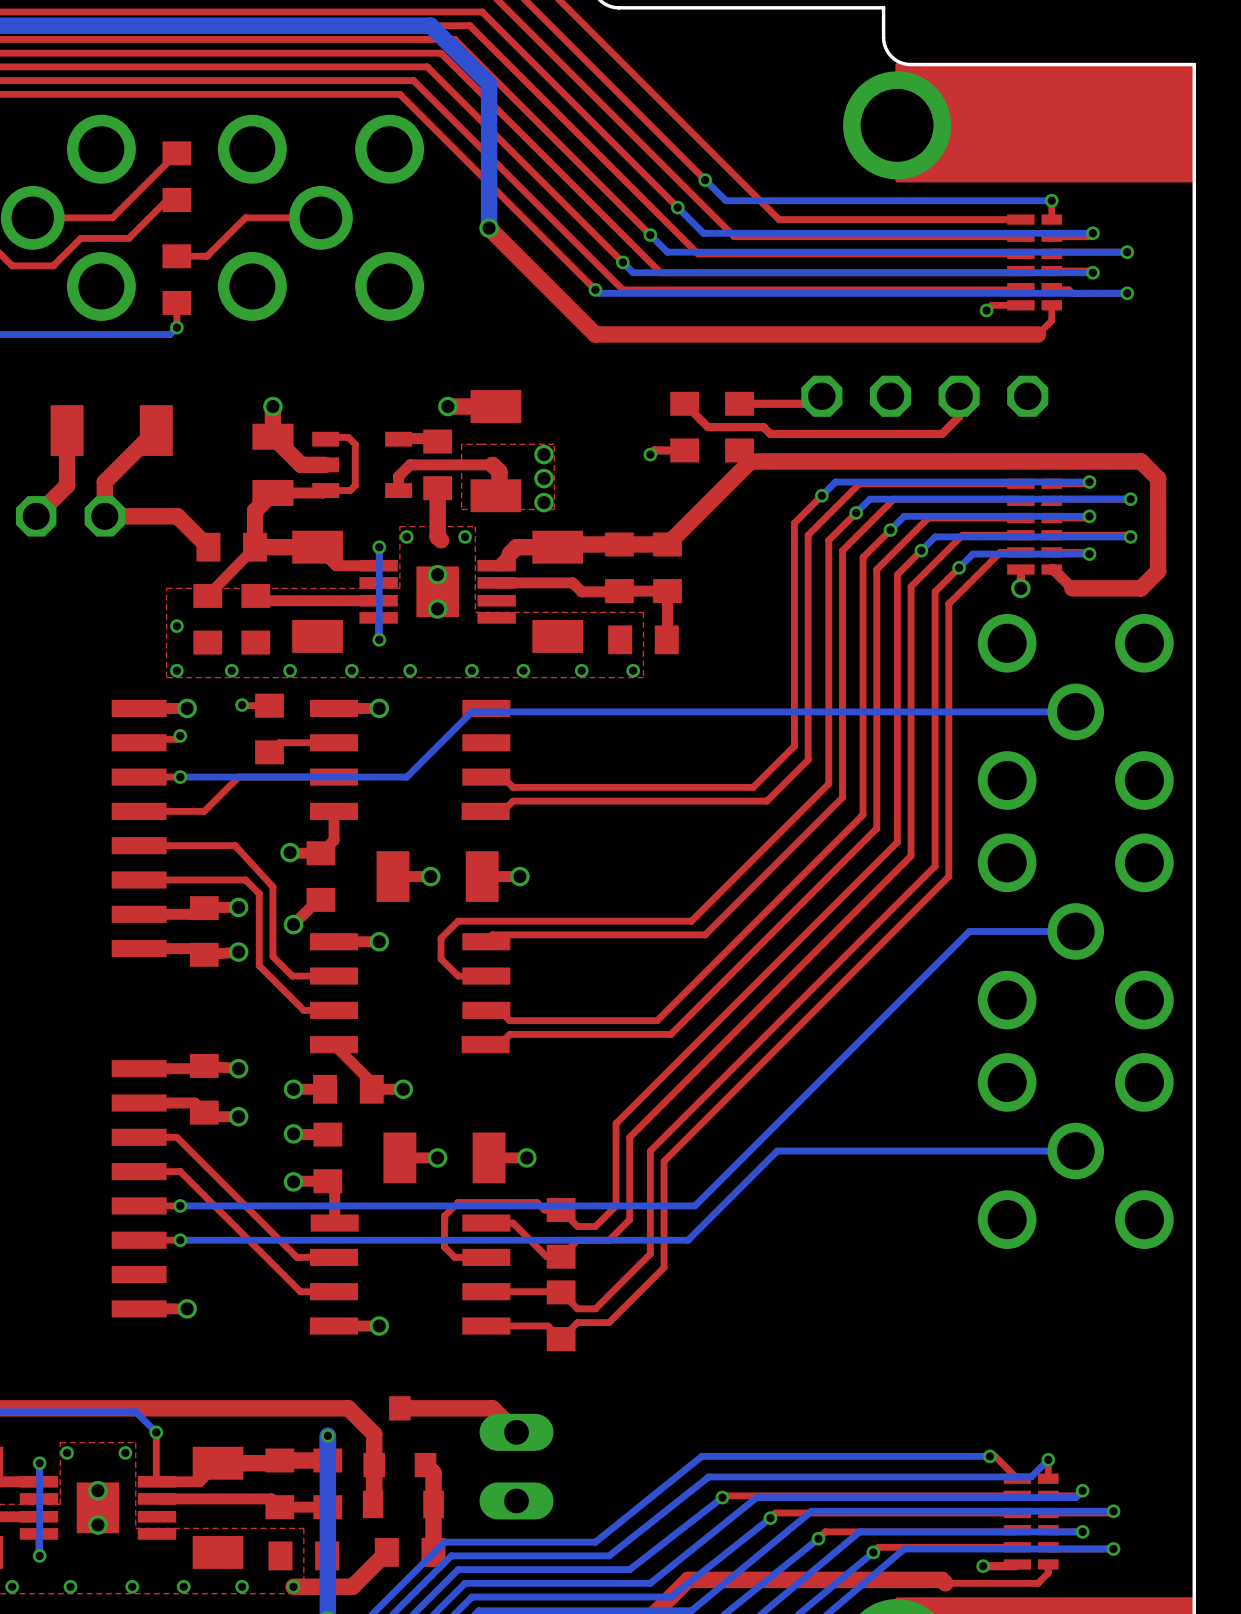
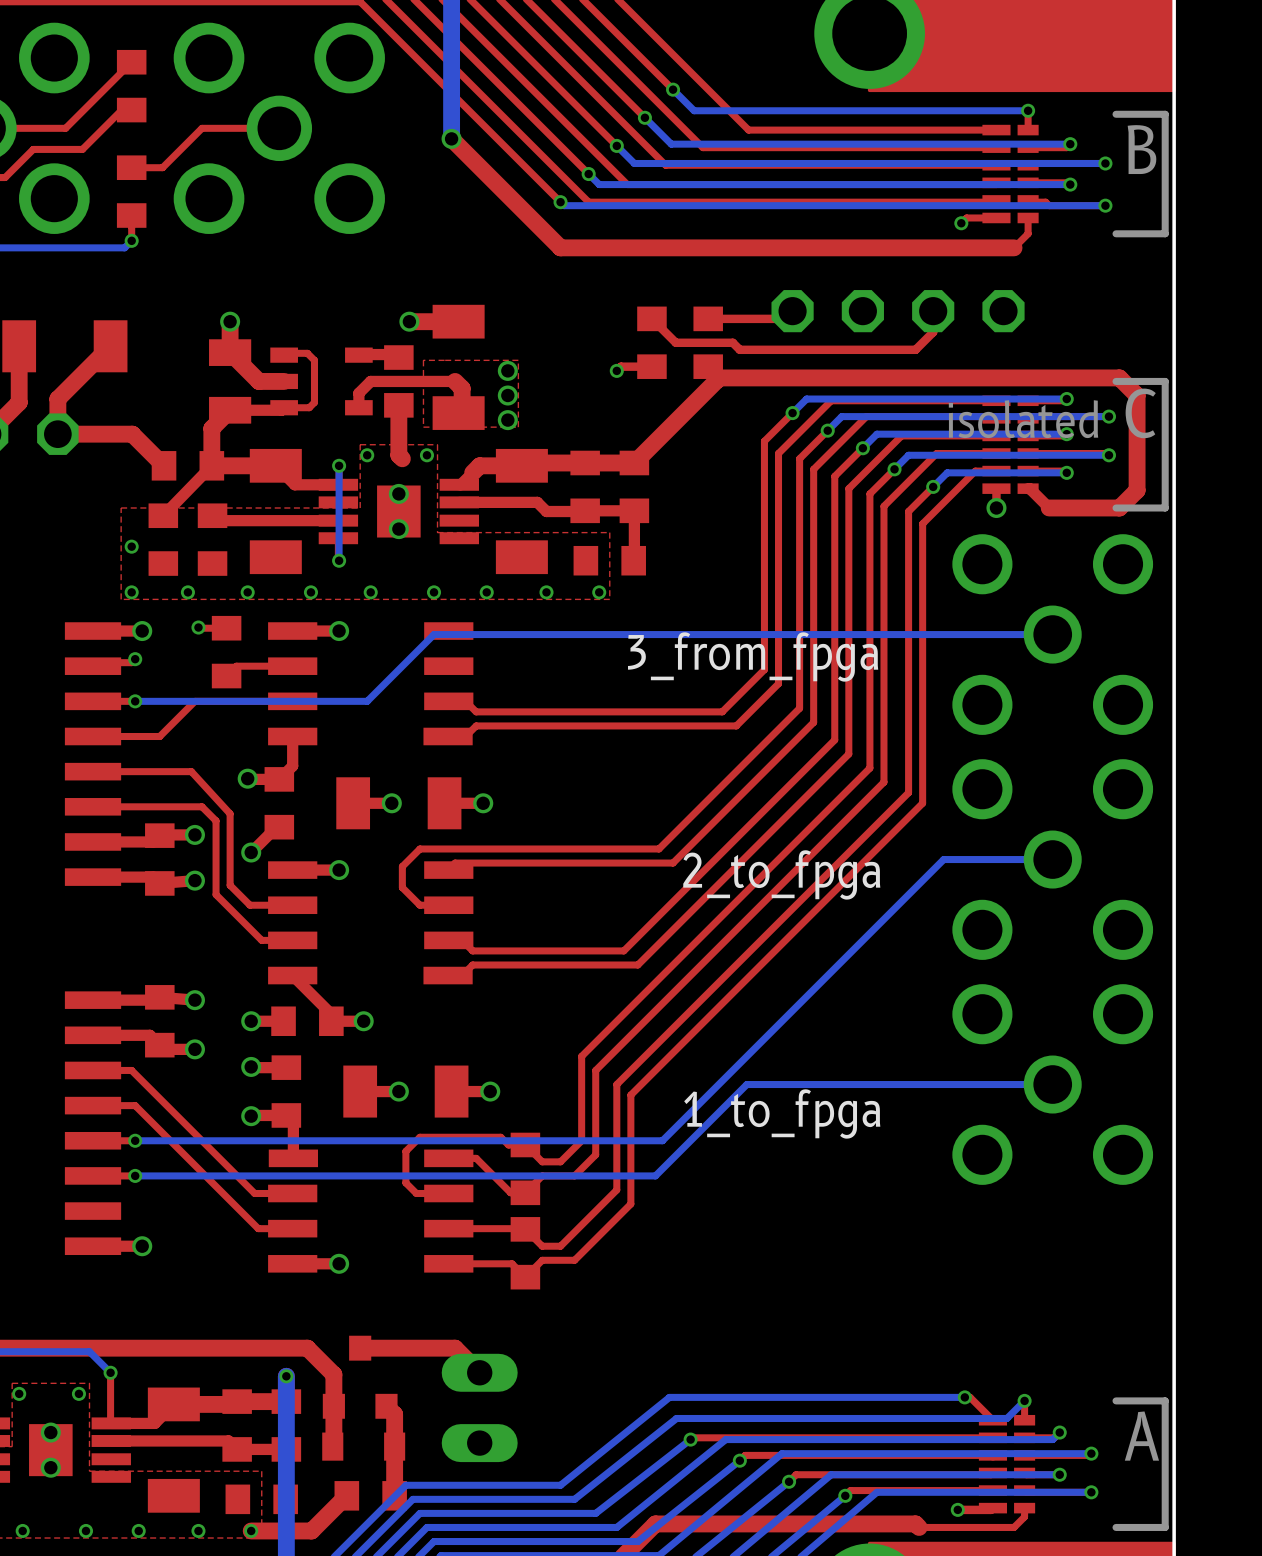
line: none -> (1115, 114) (1165, 114) (1165, 233) (1115, 233)
text: none -> B (1141, 149)
line: none -> (1115, 381) (1165, 381) (1165, 507) (1115, 507)
text: none -> C (1140, 413)
text: none -> isolated (1023, 419)
text: none -> 3_from_fpga (753, 656)
text: none -> 2_to_fpga (781, 874)
text: none -> 1_to_fpga (782, 1113)
line: none -> (1115, 1400) (1165, 1400) (1165, 1527) (1115, 1527)
text: none -> A (1141, 1436)

